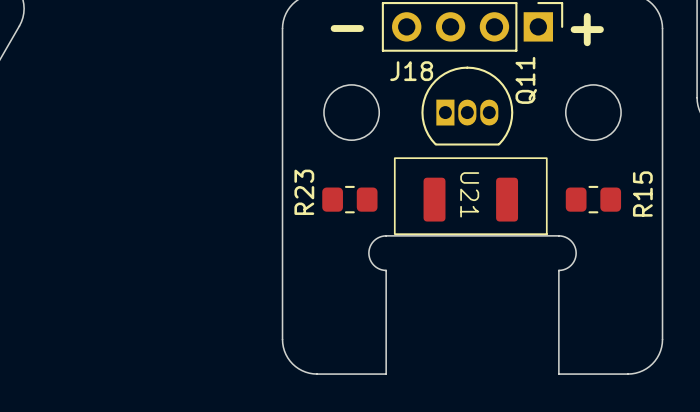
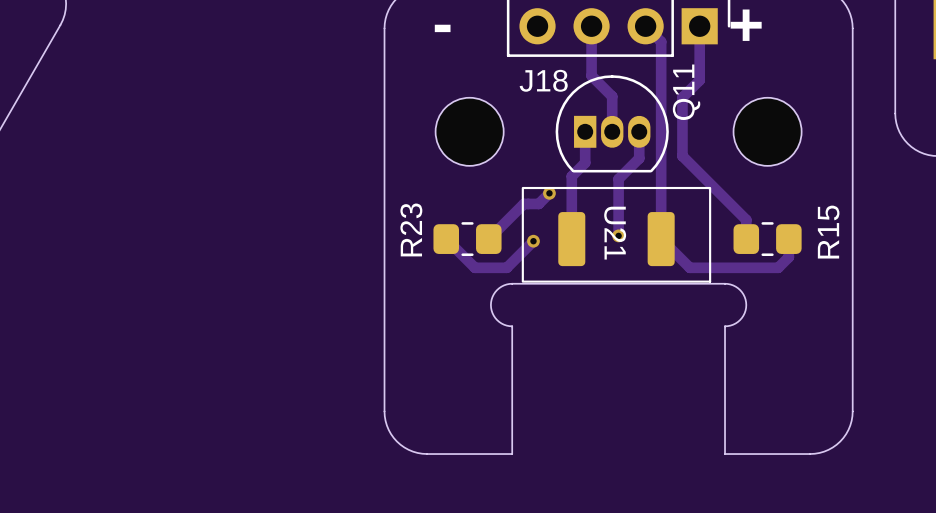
track: none -> (591, 26) (591, 75) (612, 96) (612, 131)
track: none -> (645, 26) (661, 41) (661, 239) (689, 267) (778, 267) (788, 257) (788, 239)
track: none -> (699, 26) (699, 80) (682, 97) (682, 156) (746, 219) (746, 239)
track: none -> (585, 131) (585, 162) (571, 176) (571, 239)
track: none -> (639, 131) (639, 158) (618, 179) (618, 235)
track: none -> (549, 193) (538, 203) (523, 203) (488, 239)
via: none -> (549, 193)
via: none -> (618, 235)
track: none -> (446, 239) (474, 267) (506, 267) (533, 241)
via: none -> (533, 241)

